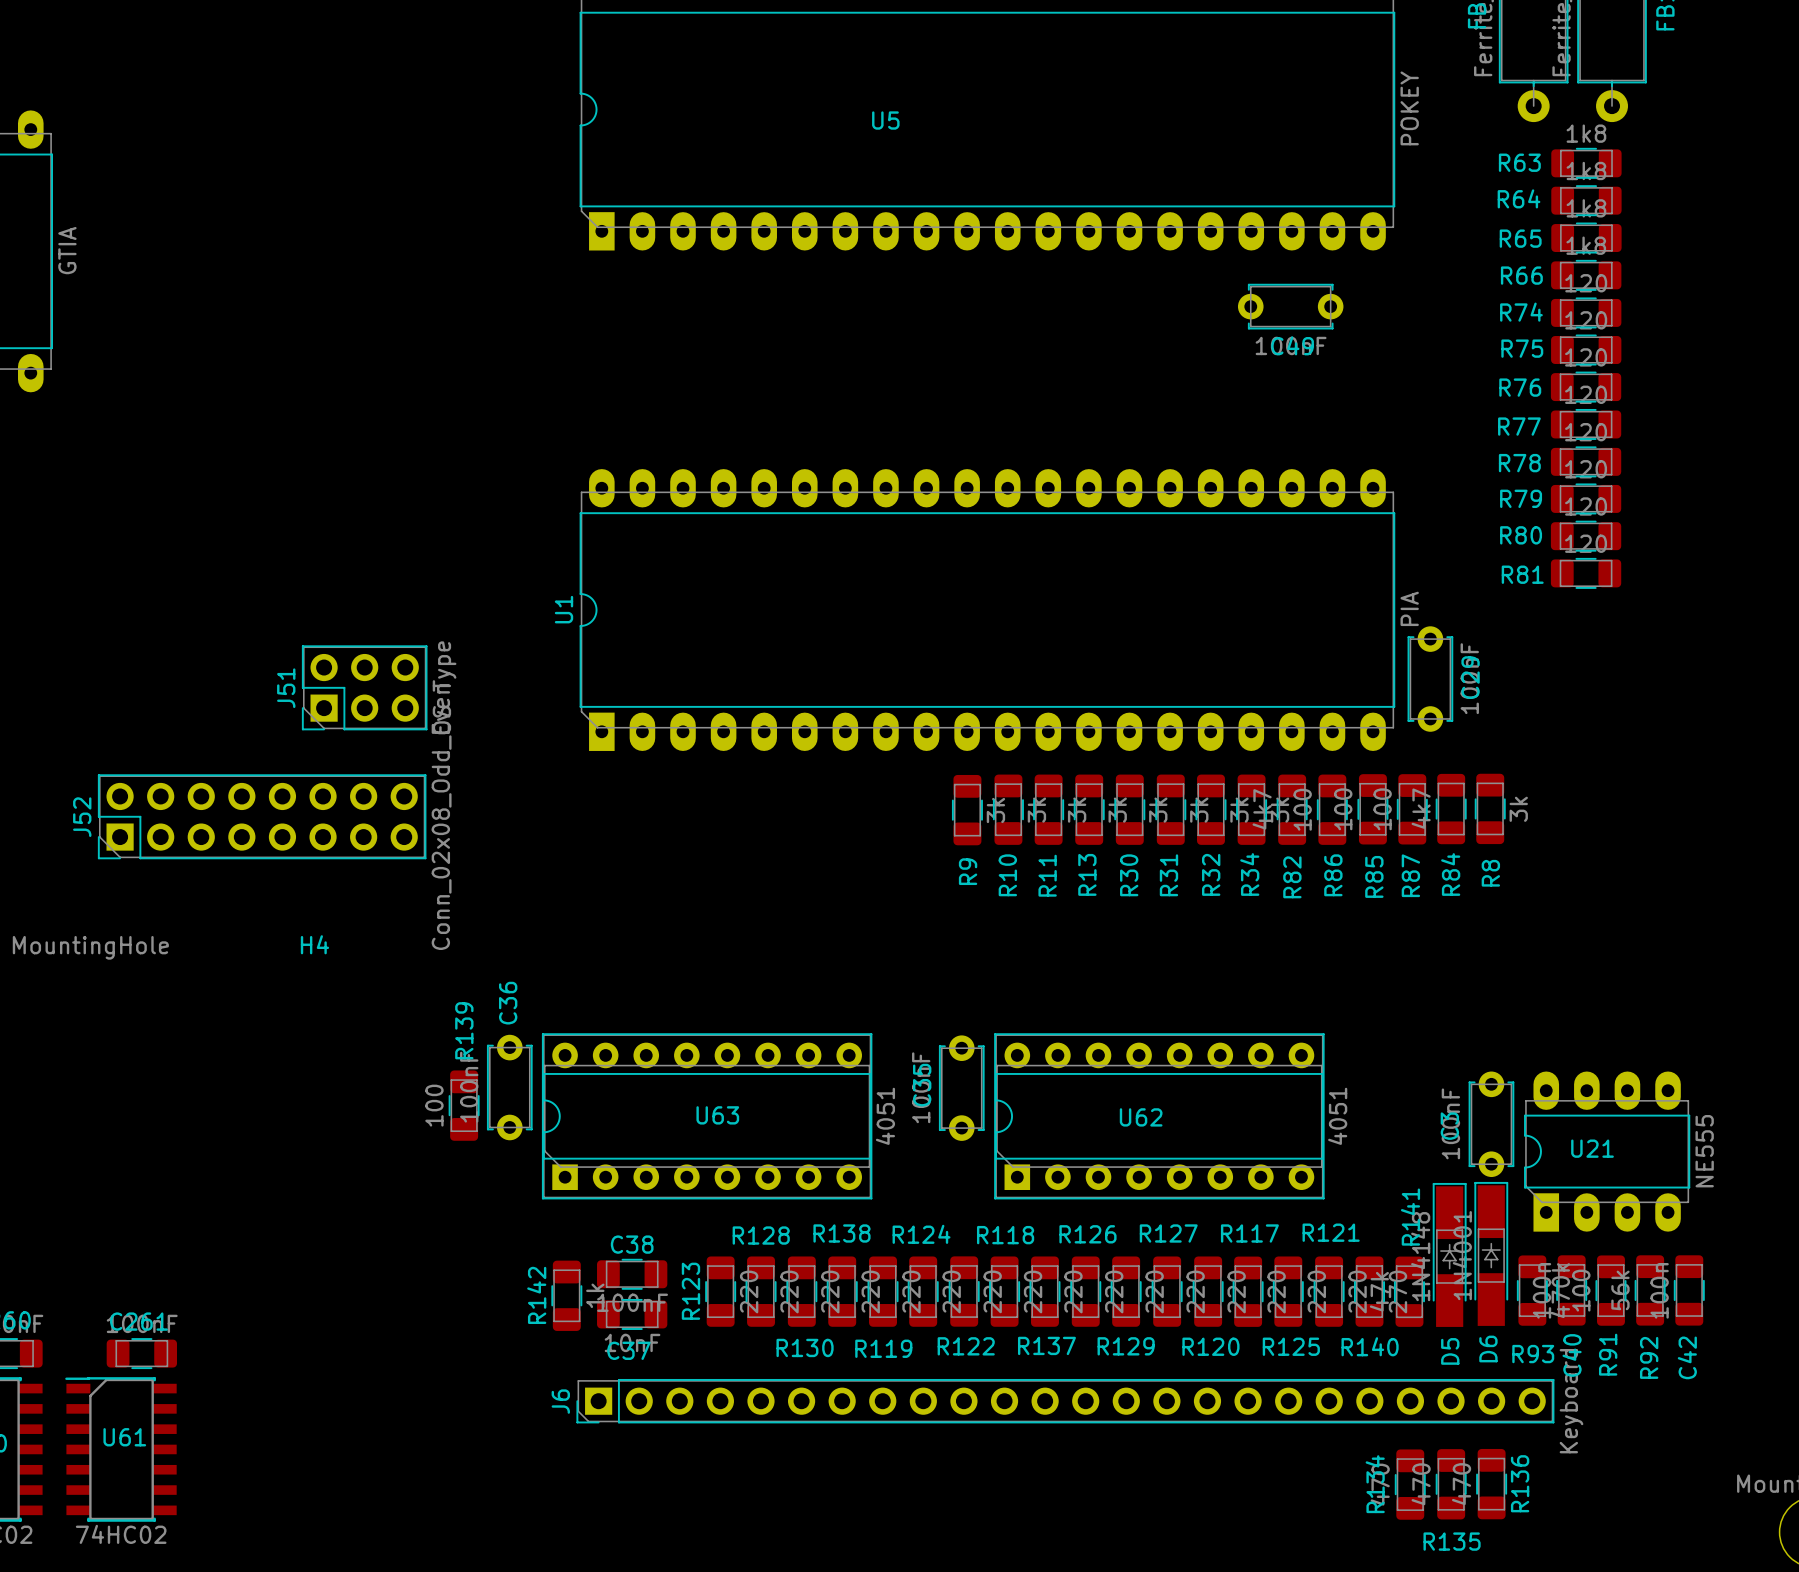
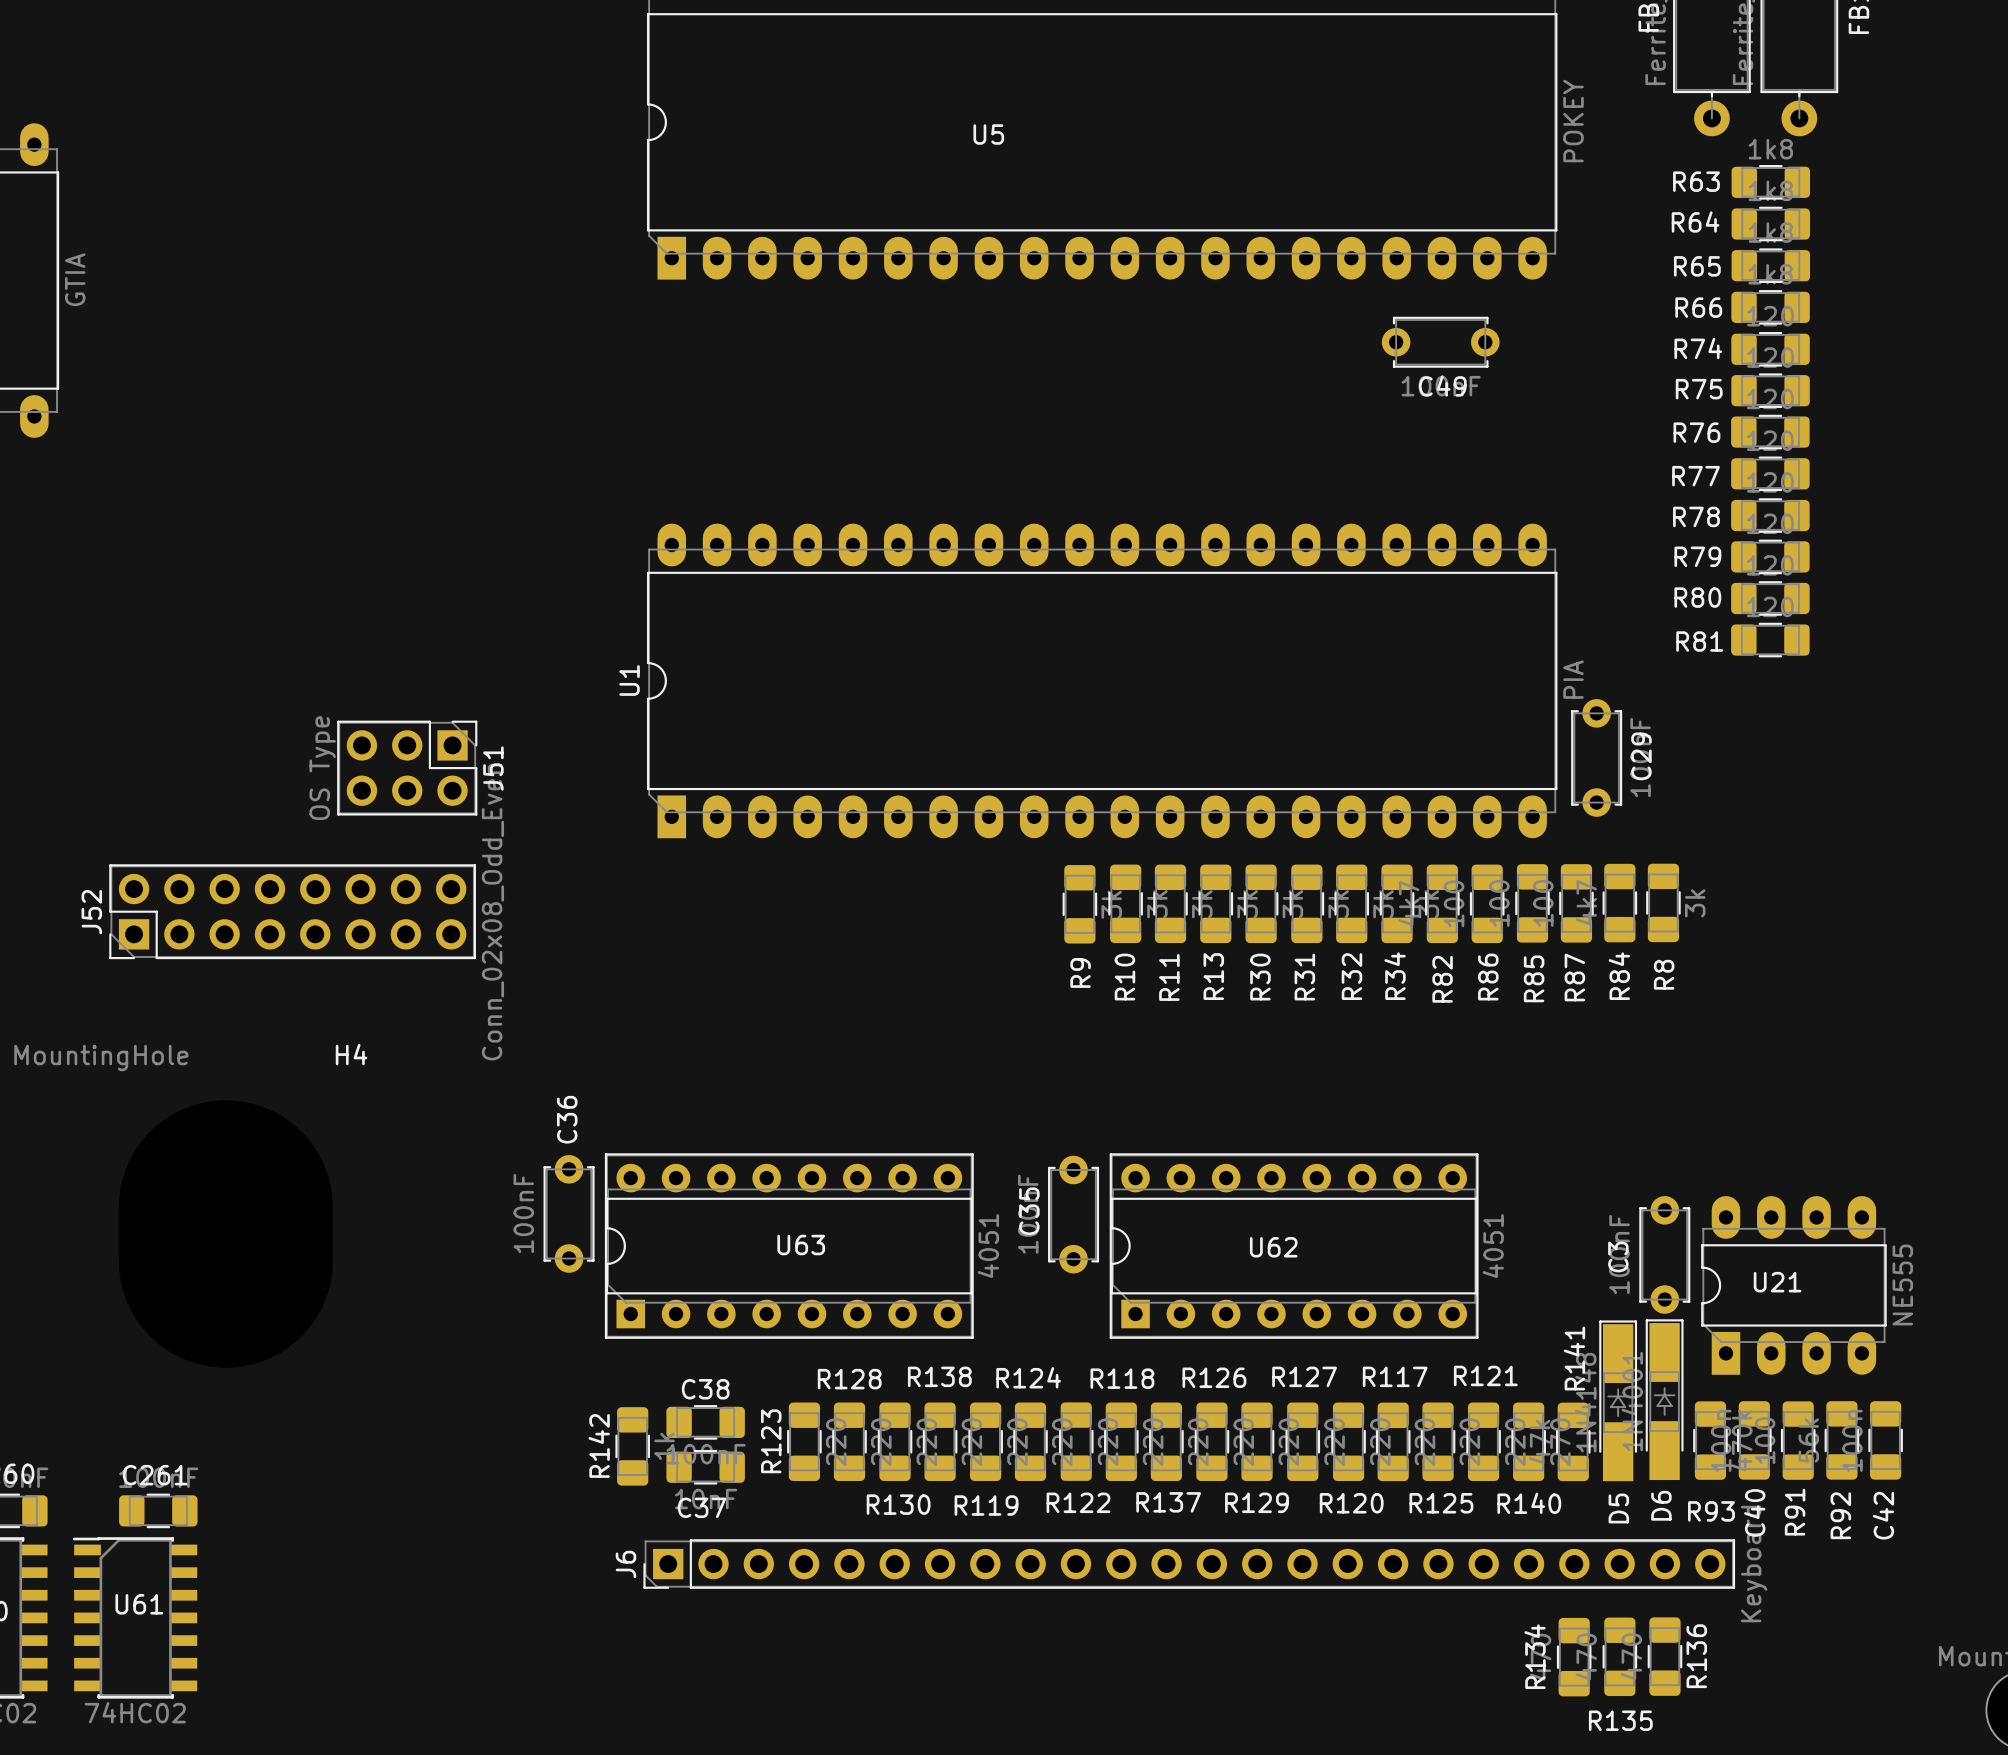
J51 rotation: 0° (364, 687) -> 180° (407, 768)
R139: 100 (464, 1105) -> none

